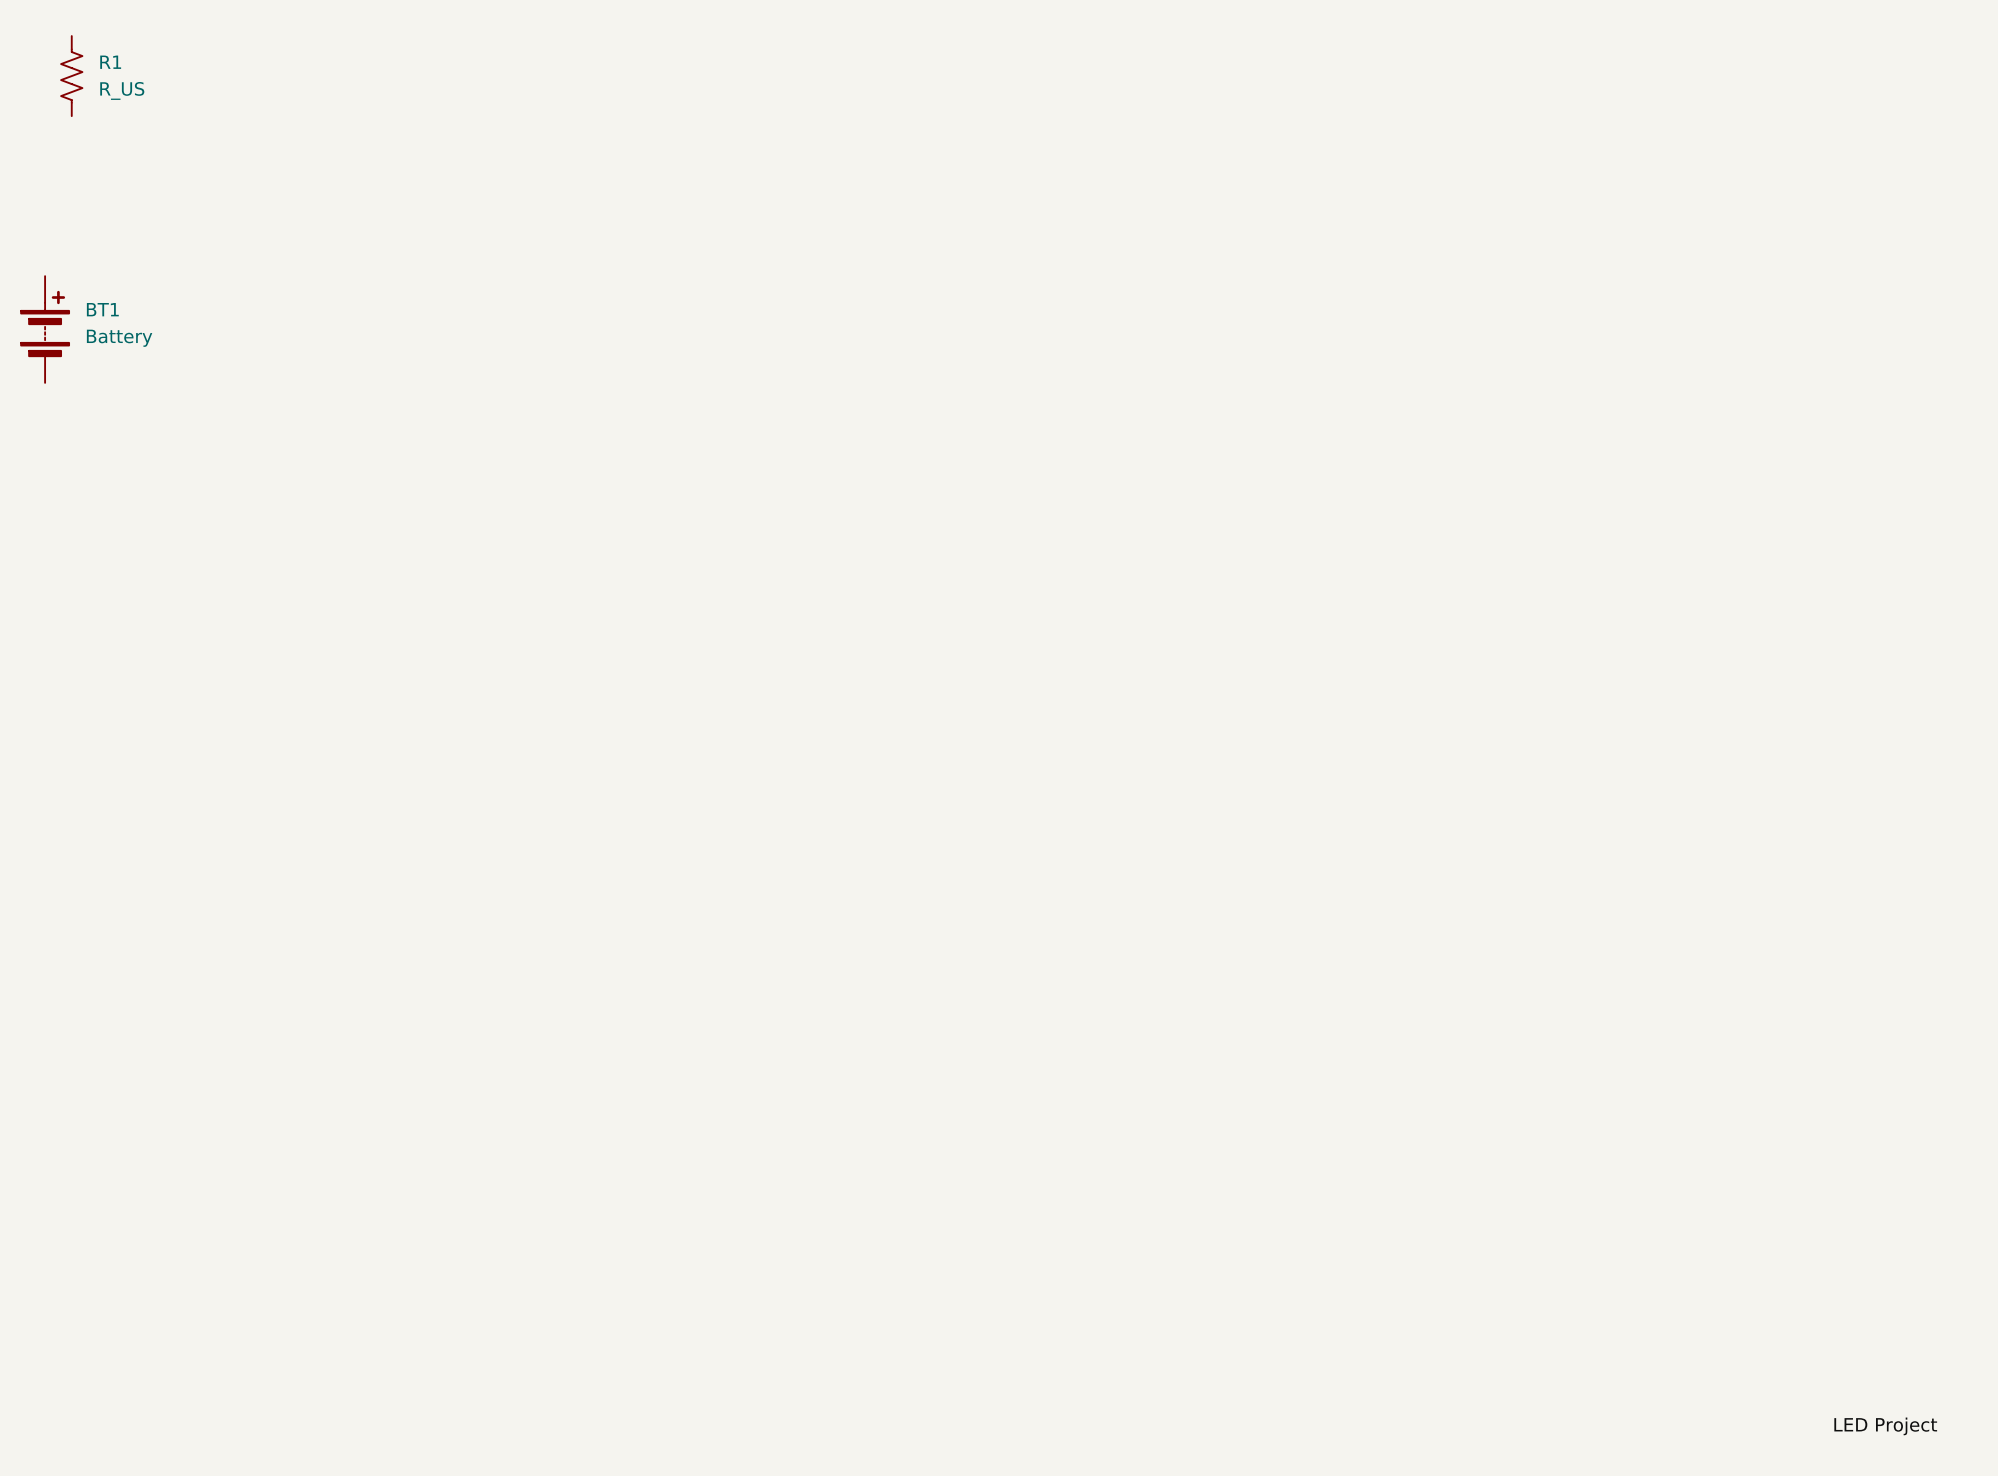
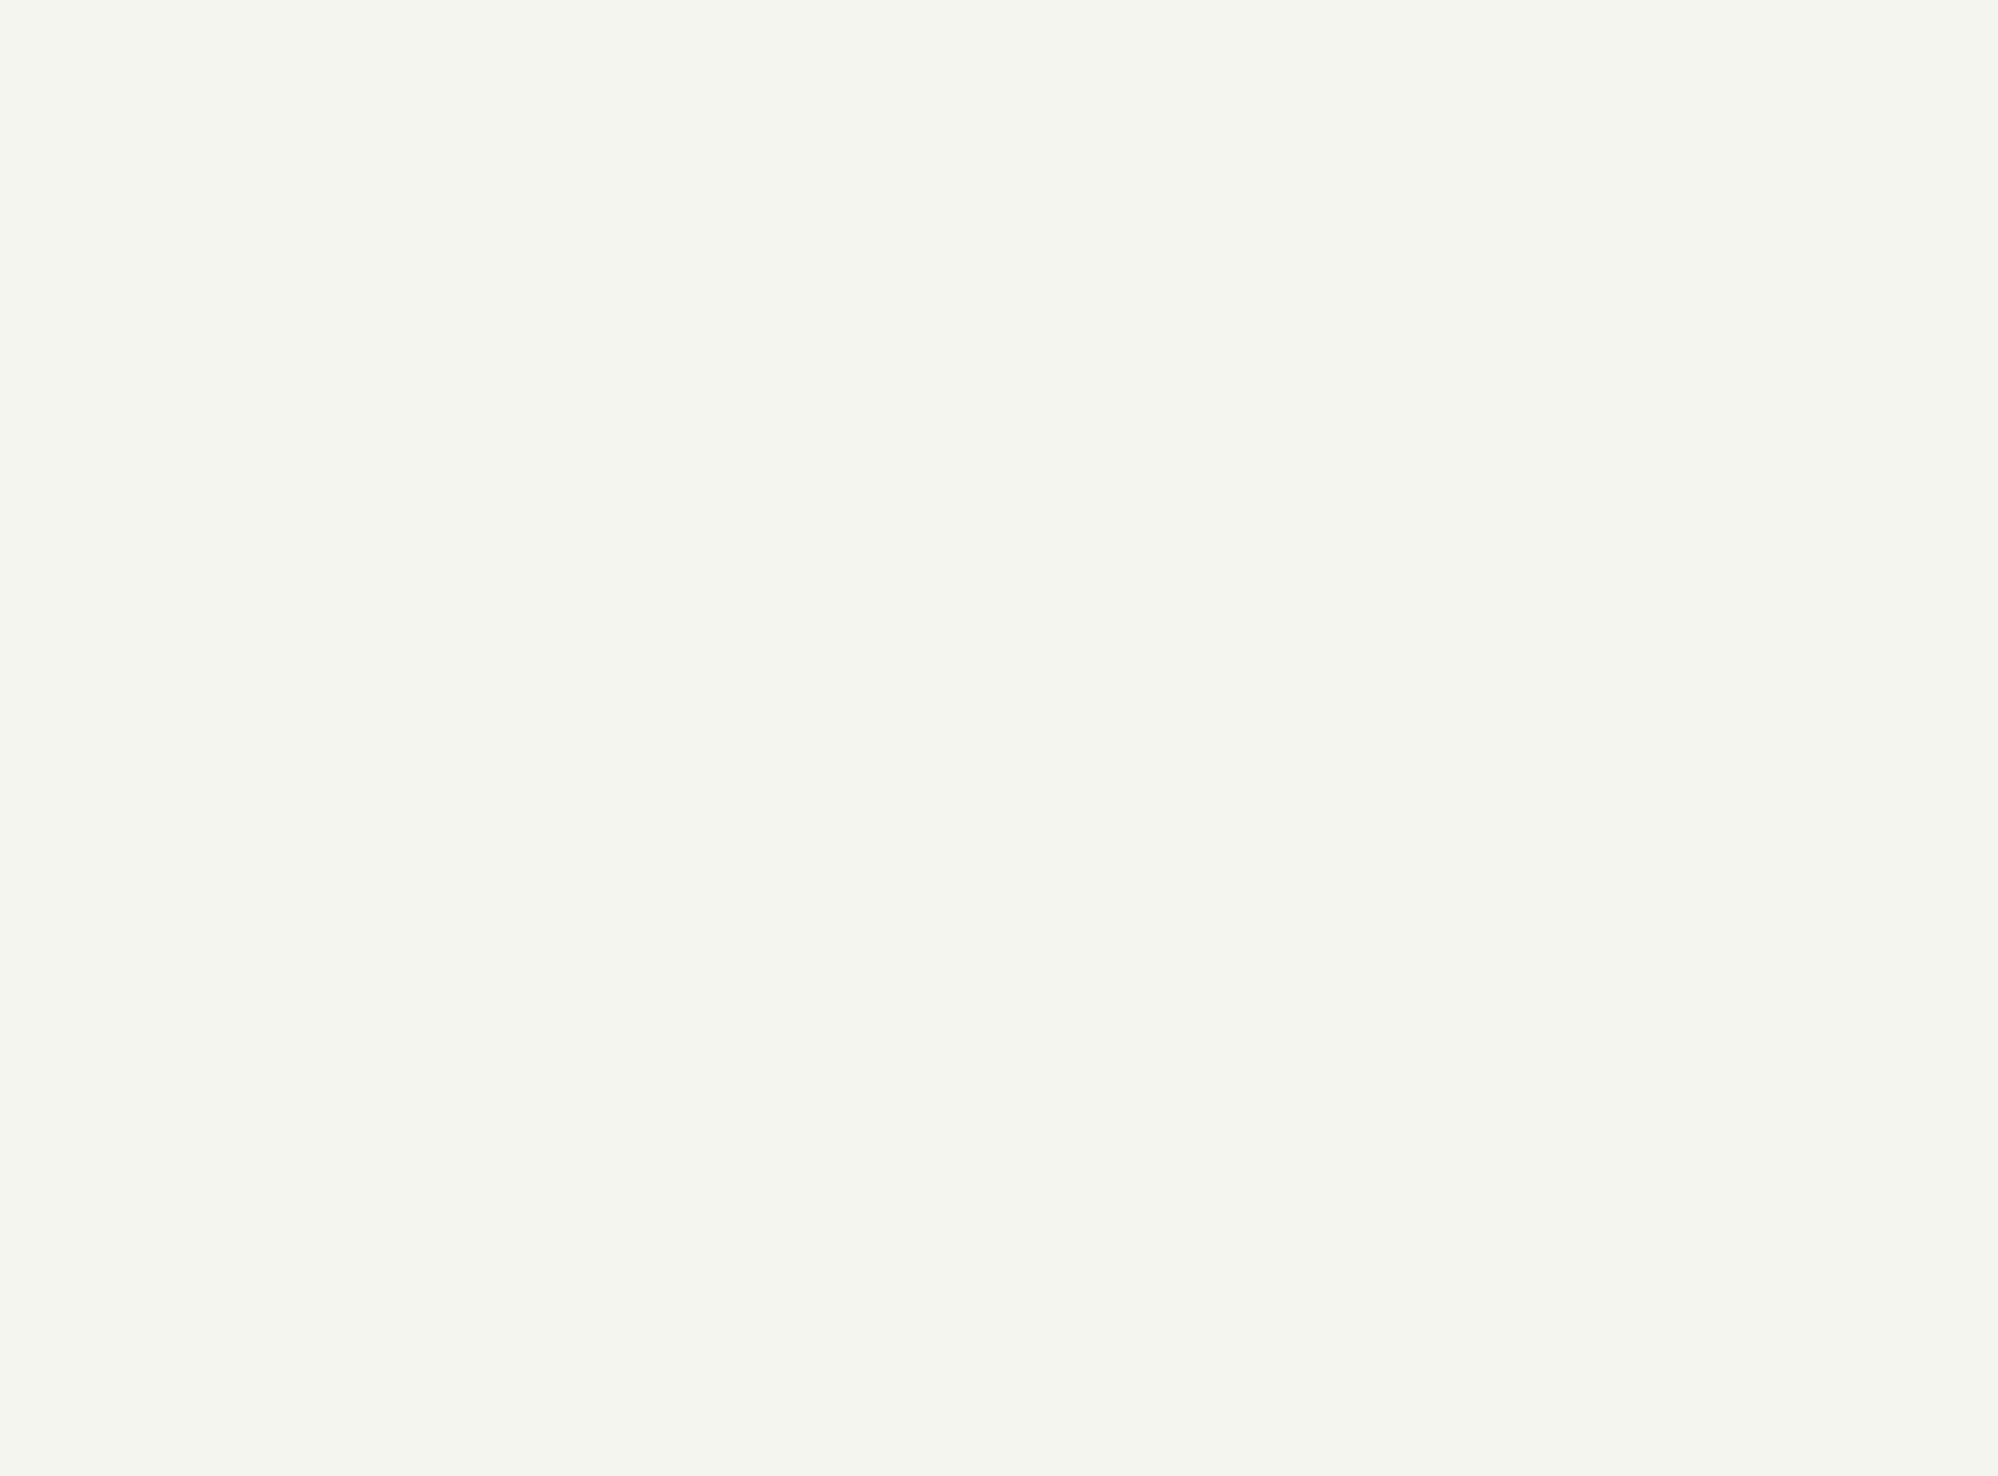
R1: R_US (71, 76) -> none
BT1: Battery (45, 329) -> none
label: LED Project (1885, 1426) -> none

